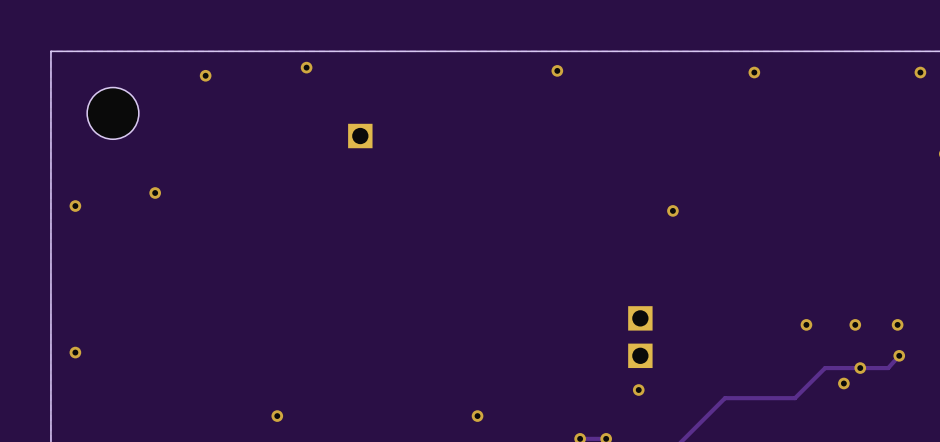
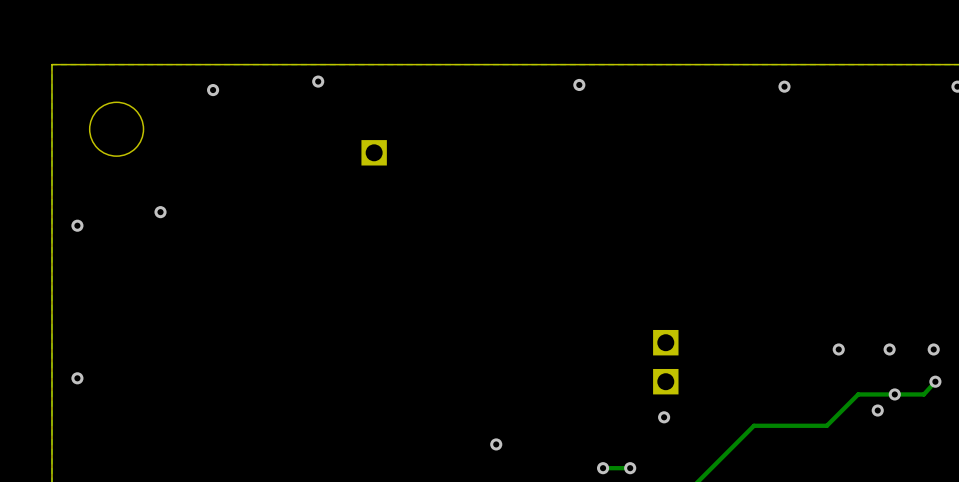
via: (672, 210) -> none
via: (277, 416) -> none

